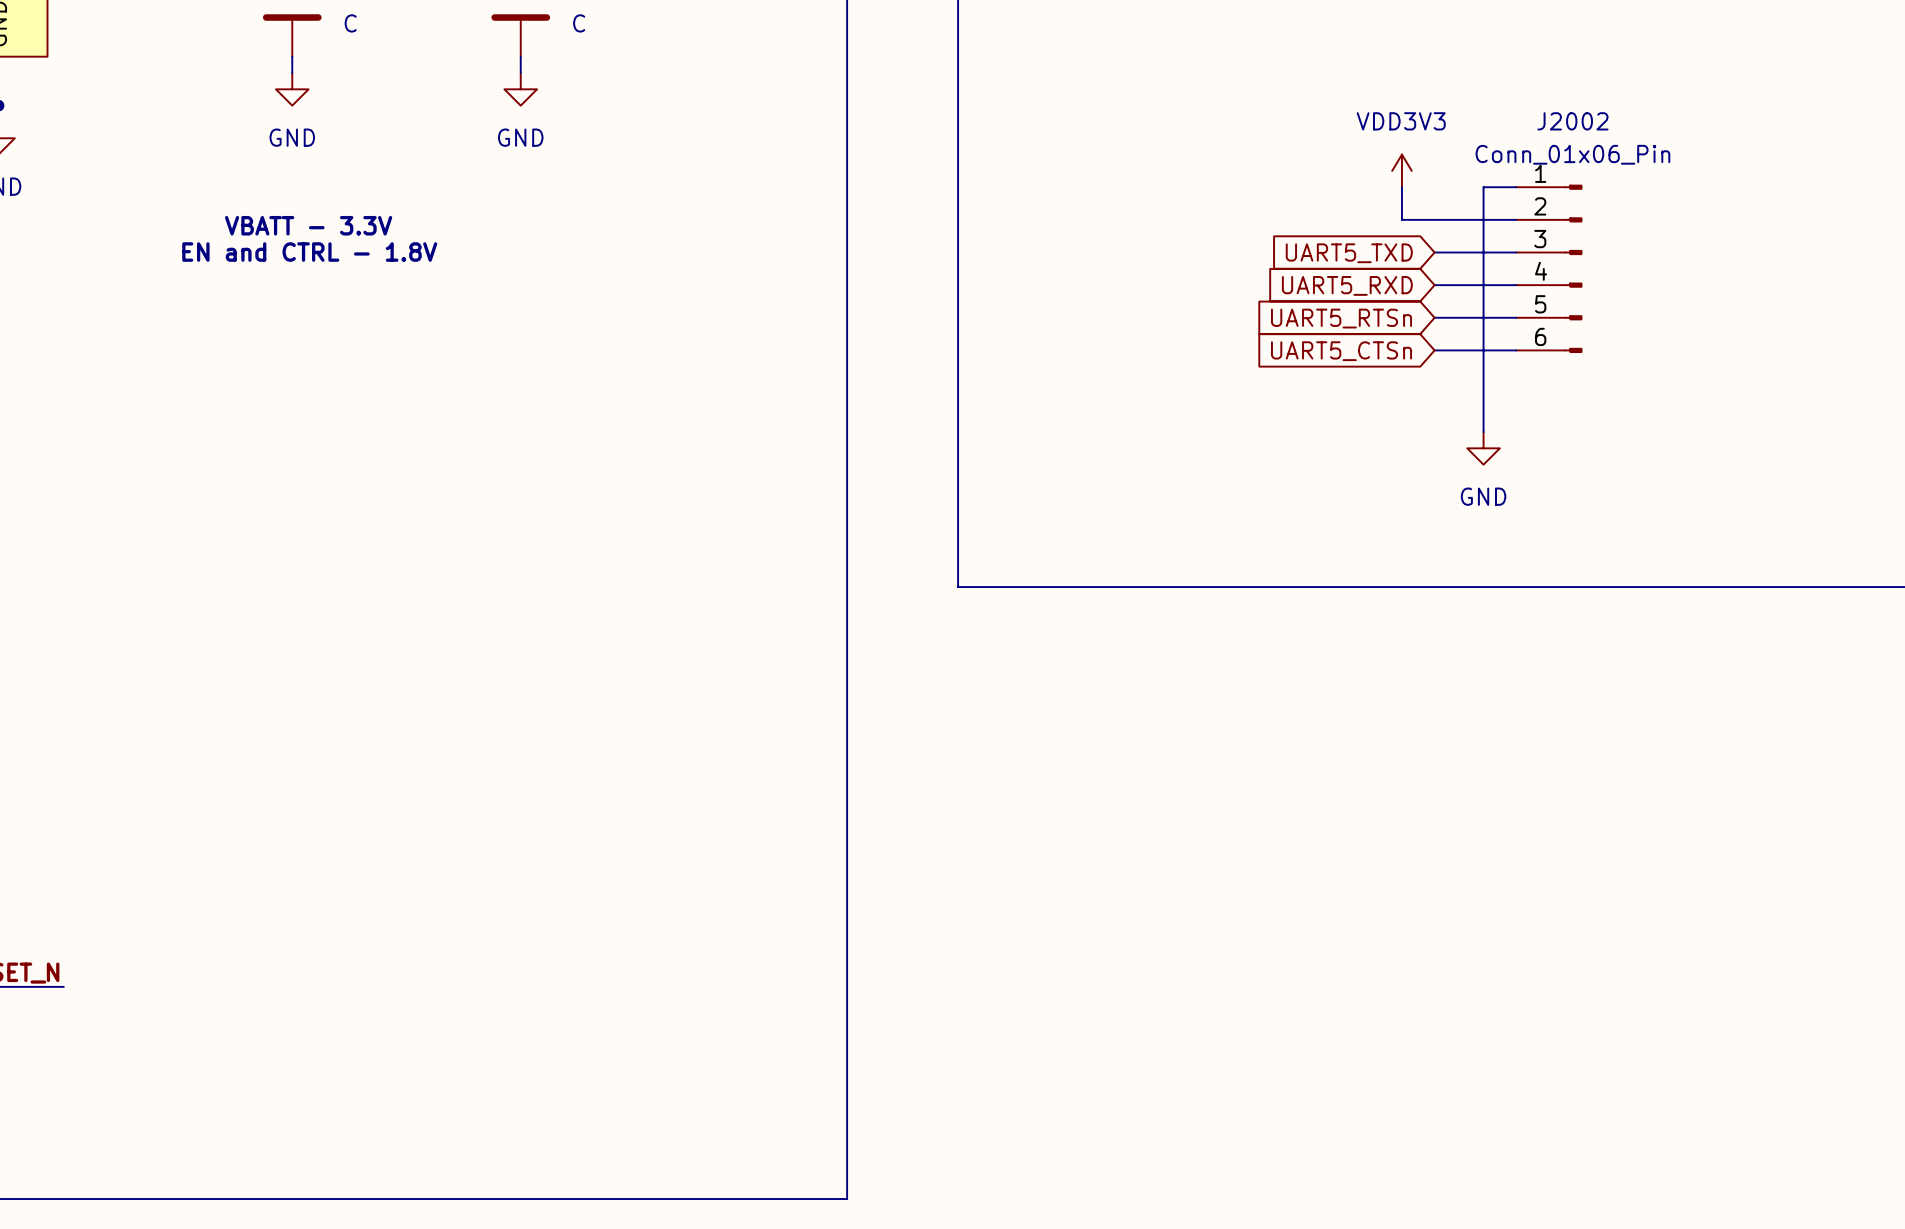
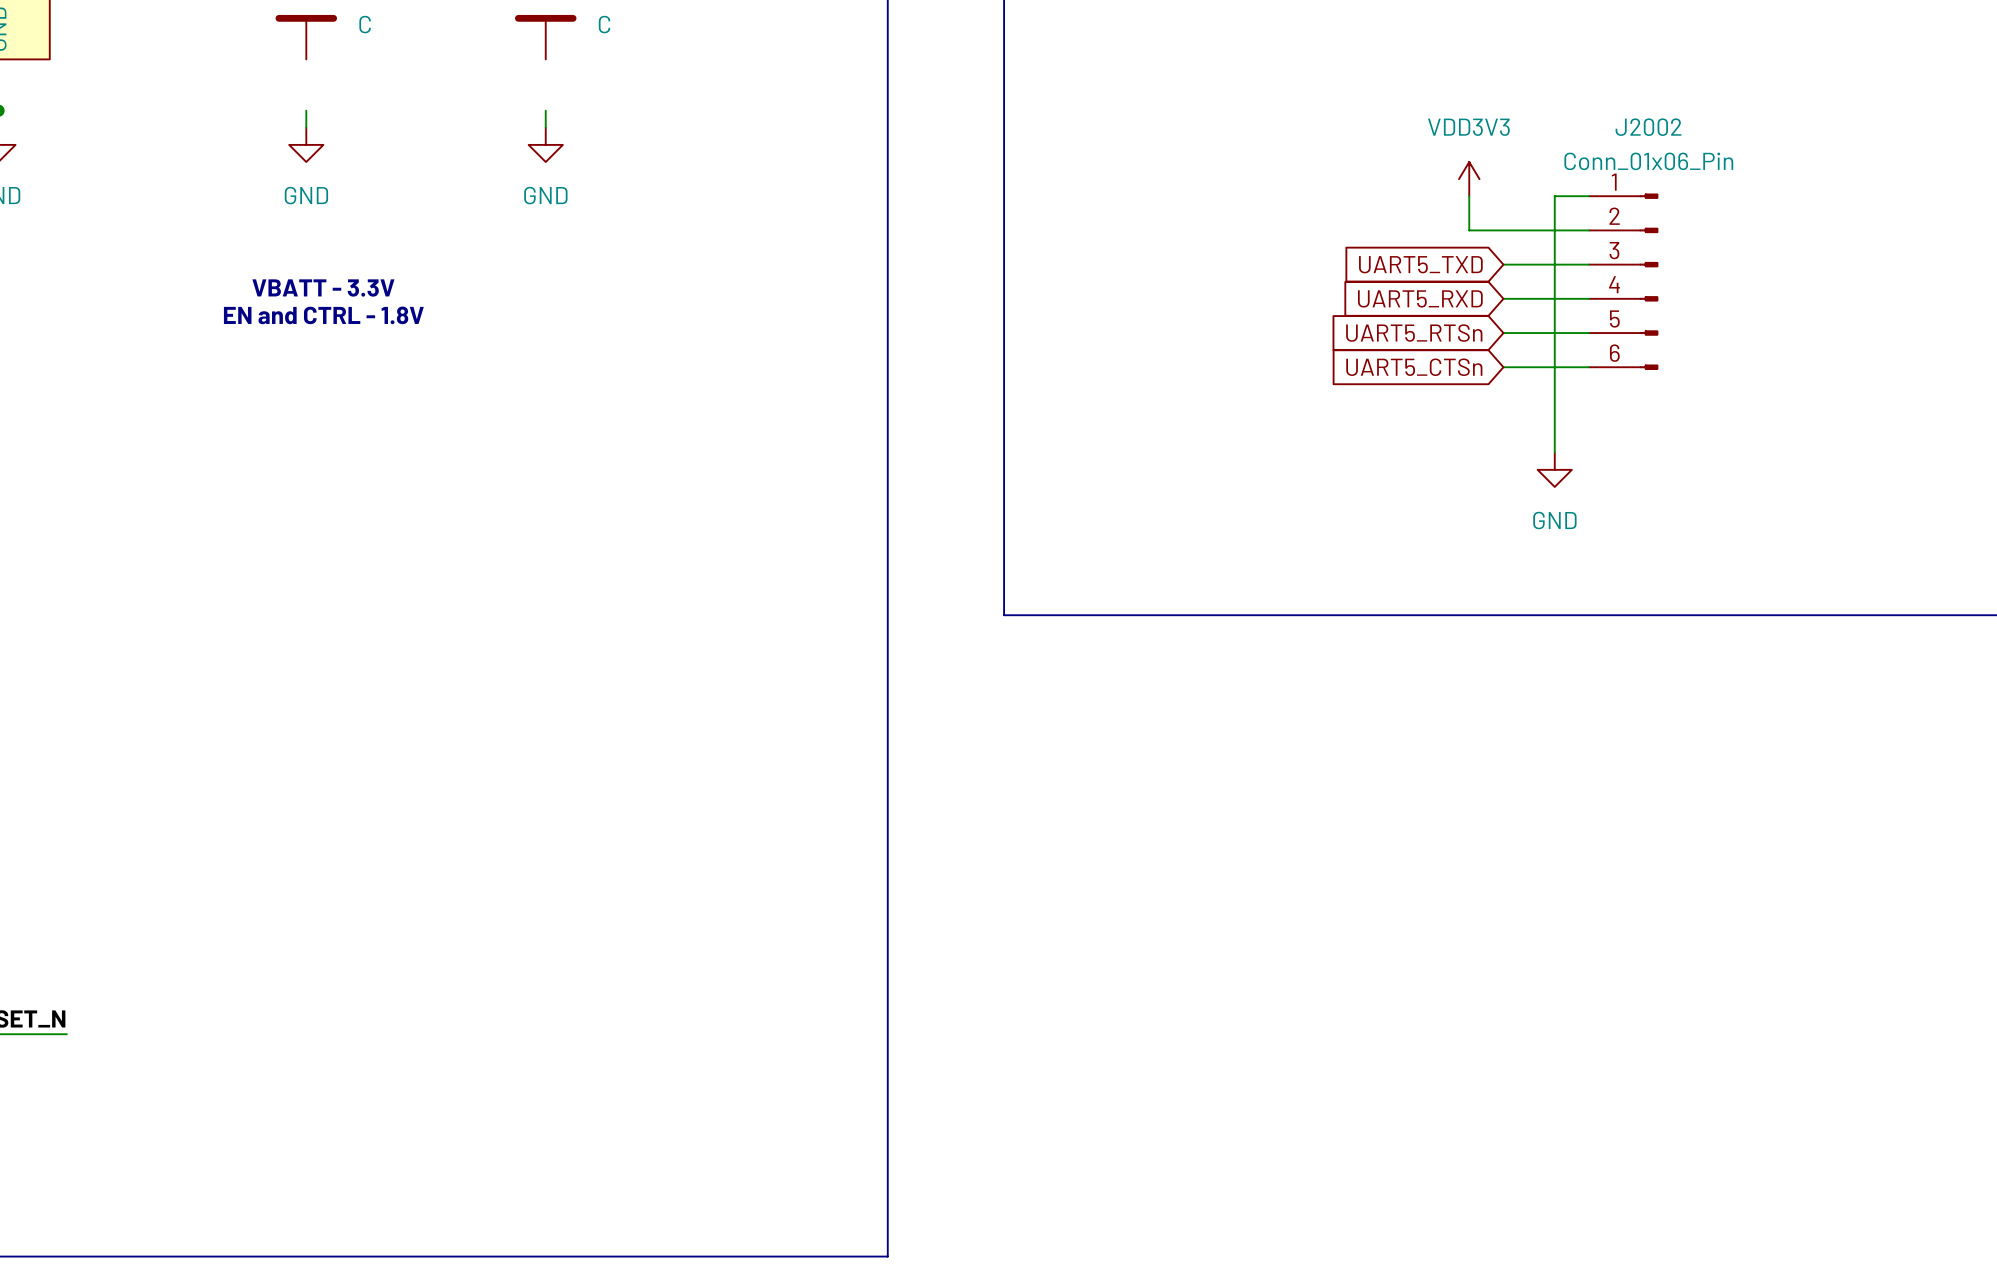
wire: (292, 56) (292, 72) -> (306, 110) (306, 127)
wire: (520, 56) (520, 72) -> (545, 110) (545, 127)
power symbol position: GND (292, 89) -> GND (306, 144)
power symbol position: GND (520, 89) -> GND (545, 144)
text position: VBATT - 3.3V (308, 225) -> VBATT - 3.3V (323, 287)
text position: EN and CTRL - 1.8V (309, 252) -> EN and CTRL - 1.8V (323, 315)

